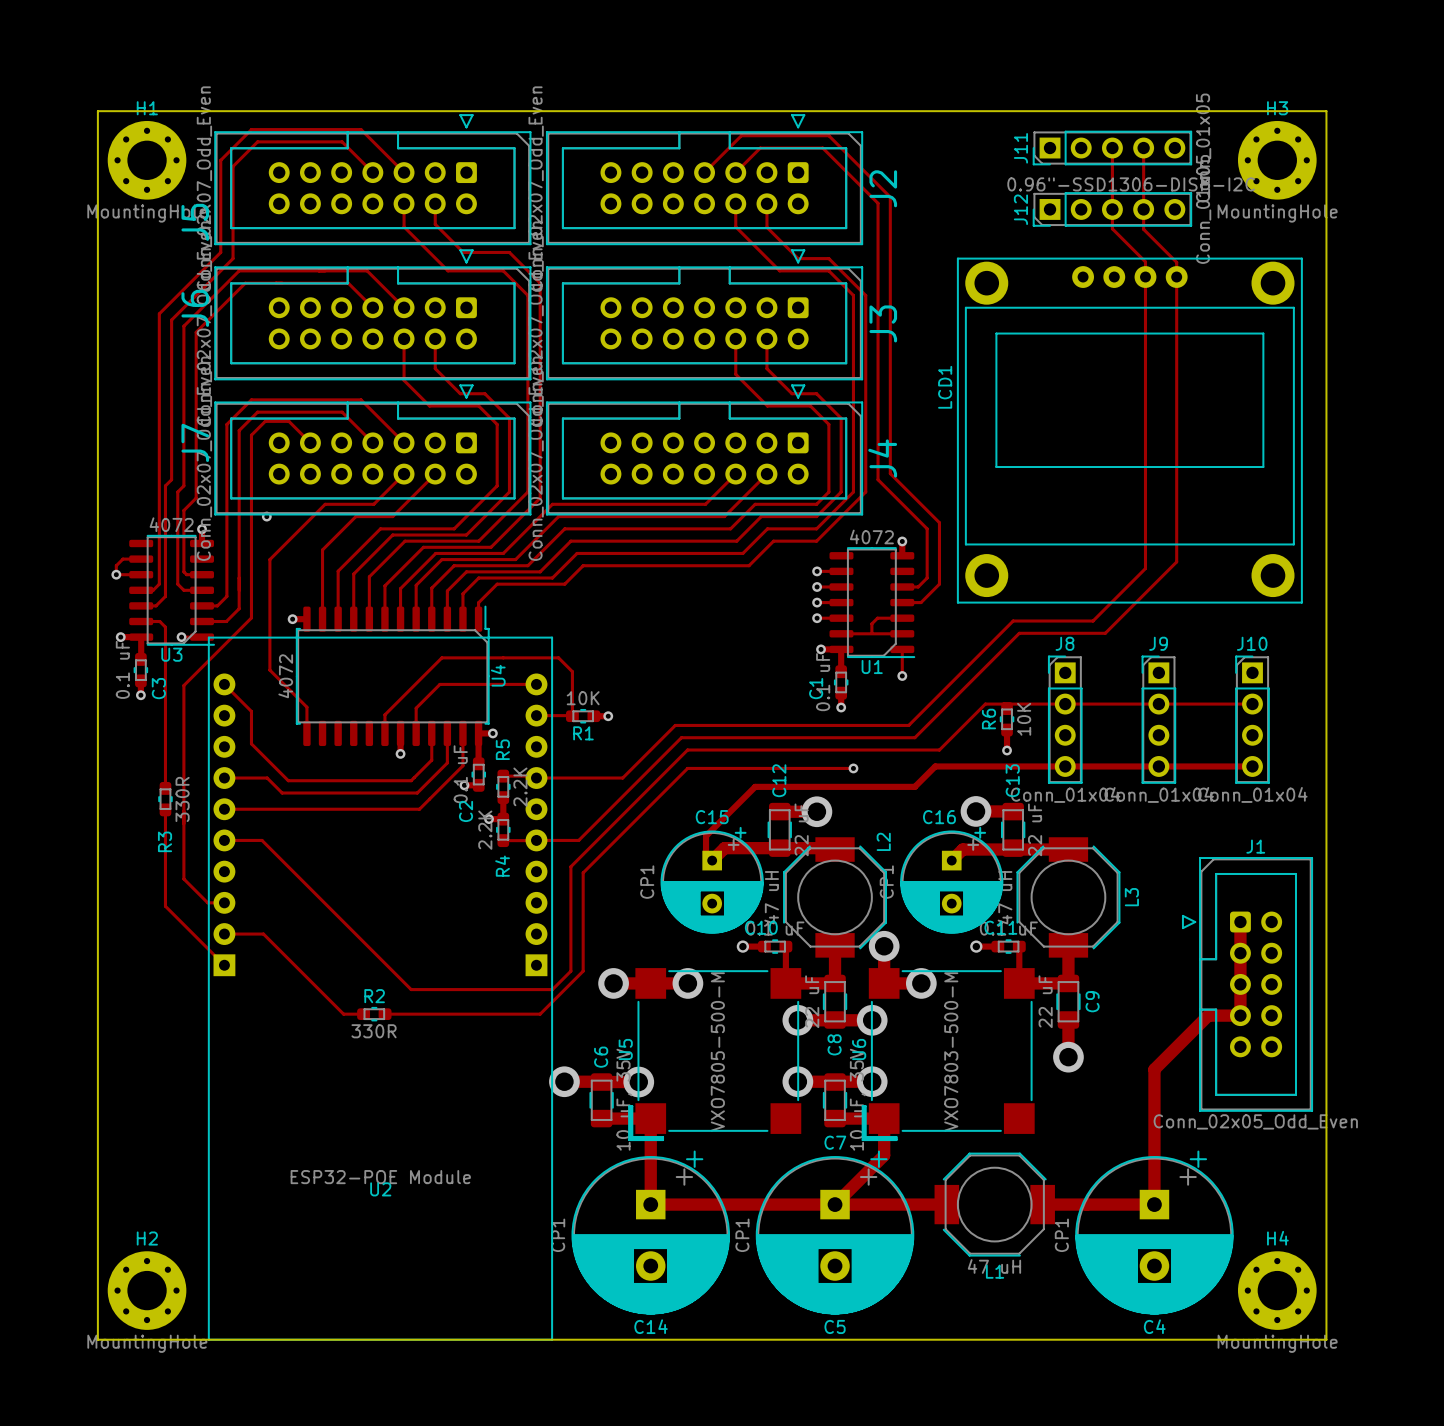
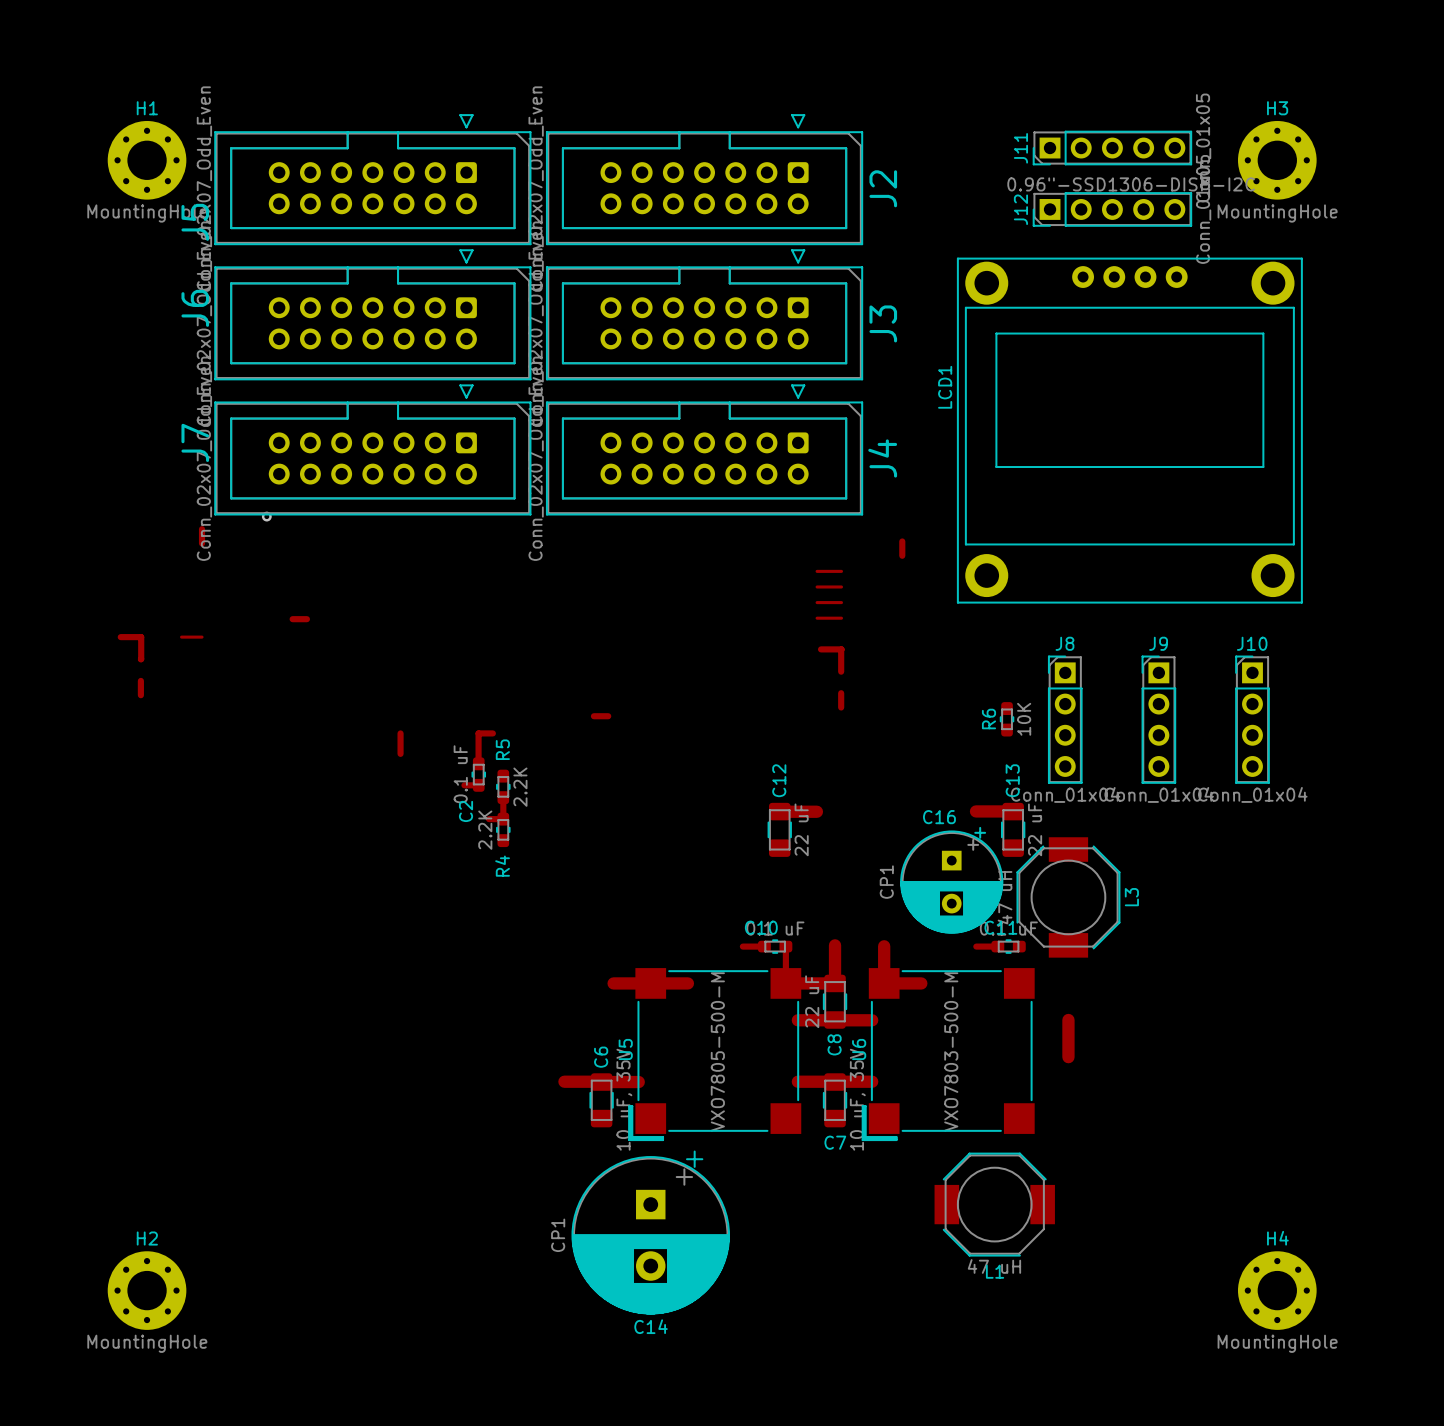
board edge: (97, 111) (1326, 111) (1326, 1339) (97, 1339) (97, 111) -> none
track: (1112, 148) (1112, 228) (1145, 261) (1145, 568) (1093, 621) (1013, 621) (908, 725) (675, 725) (622, 778) (503, 776) -> none
track: (1143, 148) (1143, 229) (1176, 262) (1176, 561) (1105, 633) (1019, 633) (914, 737) (681, 737) (578, 840) (503, 840) -> none
track: (372, 172) (342, 141) (257, 141) (233, 166) (233, 258) (171, 320) (171, 479) (165, 485) (165, 596) (156, 605) (141, 605) -> none
track: (404, 172) (361, 129) (251, 129) (220, 160) (220, 252) (159, 313) (159, 584) (153, 590) (141, 590) -> none
track: (704, 172) (741, 135) (828, 135) (890, 197) (890, 473) (939, 522) (939, 584) (921, 602) (902, 602) -> none
track: (735, 172) (760, 148) (822, 148) (878, 203) (878, 479) (927, 528) (927, 578) (918, 586) (902, 586) -> none
track: (404, 203) (404, 226) (448, 270) (503, 270) (527, 295) (527, 492) (478, 541) (405, 541) (369, 576) (369, 619) -> none
track: (435, 203) (435, 224) (463, 252) (509, 252) (540, 283) (540, 498) (491, 547) (423, 547) (384, 585) (384, 619) -> none
track: (735, 203) (735, 226) (779, 270) (828, 270) (853, 295) (853, 492) (816, 528) (767, 528) (742, 553) (577, 553) (552, 578) (478, 578) (462, 593) (462, 619) -> none
track: (766, 203) (766, 227) (798, 258) (828, 258) (865, 295) (865, 492) (816, 541) (773, 541) (749, 565) (583, 565) (564, 584) (497, 584) (478, 602) (478, 619) -> none
track: (372, 307) (348, 283) (245, 283) (196, 332) (196, 498) (183, 510) (183, 571) (186, 574) (202, 574) -> none
track: (404, 307) (367, 270) (239, 270) (183, 326) (183, 485) (177, 492) (177, 584) (183, 590) (202, 590) -> none
track: (404, 338) (404, 380) (429, 406) (478, 406) (497, 424) (497, 485) (454, 528) (380, 528) (338, 571) (338, 619) -> none
track: (435, 338) (435, 368) (460, 393) (484, 393) (509, 418) (509, 492) (466, 535) (392, 535) (353, 574) (353, 619) -> none
track: (735, 338) (735, 374) (767, 406) (810, 406) (828, 424) (828, 492) (816, 504) (755, 504) (730, 528) (564, 528) (527, 565) (454, 565) (431, 588) (431, 619) -> none
track: (766, 338) (766, 368) (792, 393) (816, 393) (841, 418) (841, 492) (816, 516) (761, 516) (736, 541) (570, 541) (540, 571) (466, 571) (447, 590) (447, 619) -> none
track: (310, 442) (288, 421) (265, 421) (251, 435) (251, 617) (183, 685) (183, 879) (207, 902) (224, 902) -> none
track: (372, 442) (342, 412) (257, 412) (239, 430) (239, 608) (226, 621) (202, 621) -> none
track: (404, 442) (361, 399) (251, 399) (226, 424) (226, 596) (217, 605) (202, 605) -> none
track: (404, 474) (373, 504) (325, 504) (269, 559) (269, 670) (306, 707) (306, 733) -> none
track: (435, 474) (392, 516) (355, 516) (322, 549) (322, 619) -> none
track: (735, 474) (705, 504) (552, 504) (503, 553) (435, 553) (400, 588) (400, 619) -> none
track: (766, 474) (724, 516) (558, 516) (515, 559) (441, 559) (416, 585) (416, 619) -> none
via: (202, 529) -> none
via: (902, 541) -> none
track: (141, 559) (122, 559) (116, 565) (116, 574) (141, 574) -> none
via: (817, 571) -> none
via: (116, 574) -> none
via: (817, 586) -> none
U3: 4072 (171, 590) -> none
via: (817, 602) -> none
U1: 4072 (872, 602) -> none
via: (817, 618) -> none
track: (902, 618) (877, 618) (871, 623) (871, 633) -> none
via: (292, 619) -> none
track: (141, 621) (159, 621) (165, 627) (165, 788) -> none
track: (841, 633) (902, 633) -> none
via: (120, 637) -> none
via: (181, 637) -> none
via: (821, 649) -> none
track: (902, 649) (902, 675) -> none
C3: 0.1 uF (140, 670) -> none
U4: 4072 (392, 675) -> none
via: (902, 675) -> none
C1: 0.1 uF (841, 682) -> none
track: (224, 684) (251, 711) (251, 743) (288, 780) (411, 780) (431, 760) (431, 733) -> none
track: (536, 684) (439, 684) (416, 708) (416, 733) -> none
via: (140, 695) -> none
track: (1252, 704) (985, 704) (939, 750) (687, 750) (570, 866) (570, 971) (552, 989) (411, 989) (262, 840) (224, 840) -> none
via: (841, 707) -> none
track: (536, 715) (568, 715) (572, 719) -> none
track: (572, 716) (572, 671) (558, 657) (441, 657) (384, 714) (384, 733) -> none
R1: 10K (583, 716) -> none
via: (608, 716) -> none
track: (1007, 730) (1007, 750) -> none
track: (447, 733) (447, 762) (417, 793) (282, 793) (267, 778) (224, 778) -> none
track: (462, 733) (462, 765) (419, 809) (224, 809) -> none
via: (492, 733) -> none
via: (1007, 750) -> none
via: (400, 753) -> none
track: (1252, 766) (935, 766) (914, 786) (755, 786) (706, 836) (706, 854) (712, 860) (724, 848) (835, 849) -> none
track: (853, 768) (687, 768) (583, 872) (583, 971) (540, 1014) (385, 1014) -> none
via: (853, 768) -> none
via: (464, 785) -> none
R3: 330R (165, 799) -> none
track: (165, 809) (165, 906) (224, 965) -> none
via: (816, 811) -> none
via: (976, 811) -> none
via: (489, 819) -> none
track: (1068, 849) (962, 849) (951, 860) -> none
C15: CP1 (712, 880) -> none
L2: 47 uH (835, 897) -> none
track: (1240, 922) (1240, 1015) (1208, 1015) (1154, 1069) (1154, 1204) (1042, 1204) -> none
track: (224, 934) (263, 934) (343, 1014) (363, 1014) -> none
track: (1068, 945) (1068, 983) (1019, 983) (1019, 946) -> none
via: (742, 946) -> none
via: (884, 946) -> none
via: (976, 946) -> none
via: (613, 983) -> none
via: (687, 983) -> none
via: (921, 983) -> none
J1: Conn_02x05_Odd_Even (1247, 984) -> none
U2: ESP32-POE Module (380, 988) -> none
C9: 22 uF (1068, 1001) -> none
R2: 330R (374, 1014) -> none
via: (797, 1020) -> none
via: (872, 1020) -> none
via: (1068, 1057) -> none
via: (564, 1081) -> none
via: (797, 1081) -> none
via: (872, 1081) -> none
via: (638, 1082) -> none
track: (601, 1118) (650, 1118) (650, 1204) (946, 1204) -> none
track: (835, 1118) (884, 1118) (884, 1155) (835, 1204) -> none
C5: CP1 (835, 1232) -> none
C4: CP1 (1154, 1232) -> none

